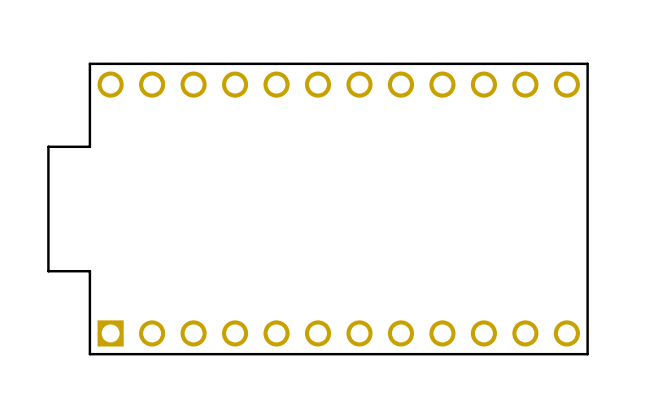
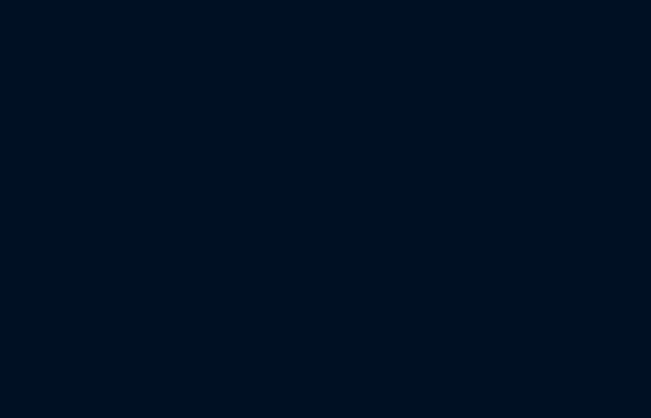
part: (318, 209) -> none

